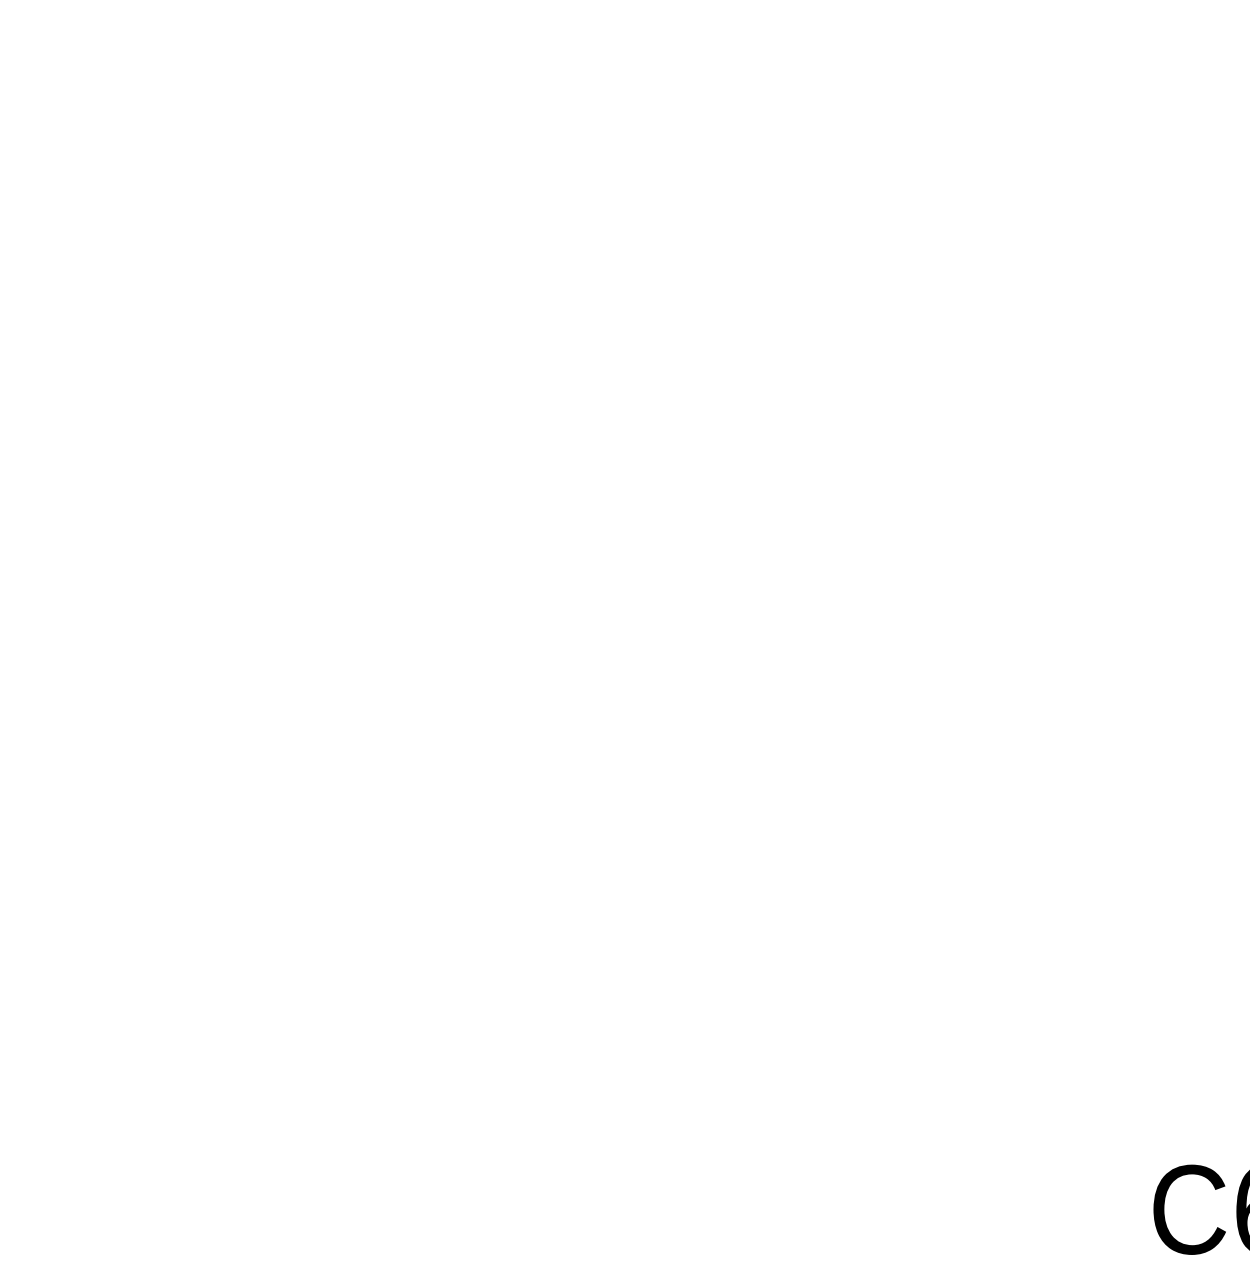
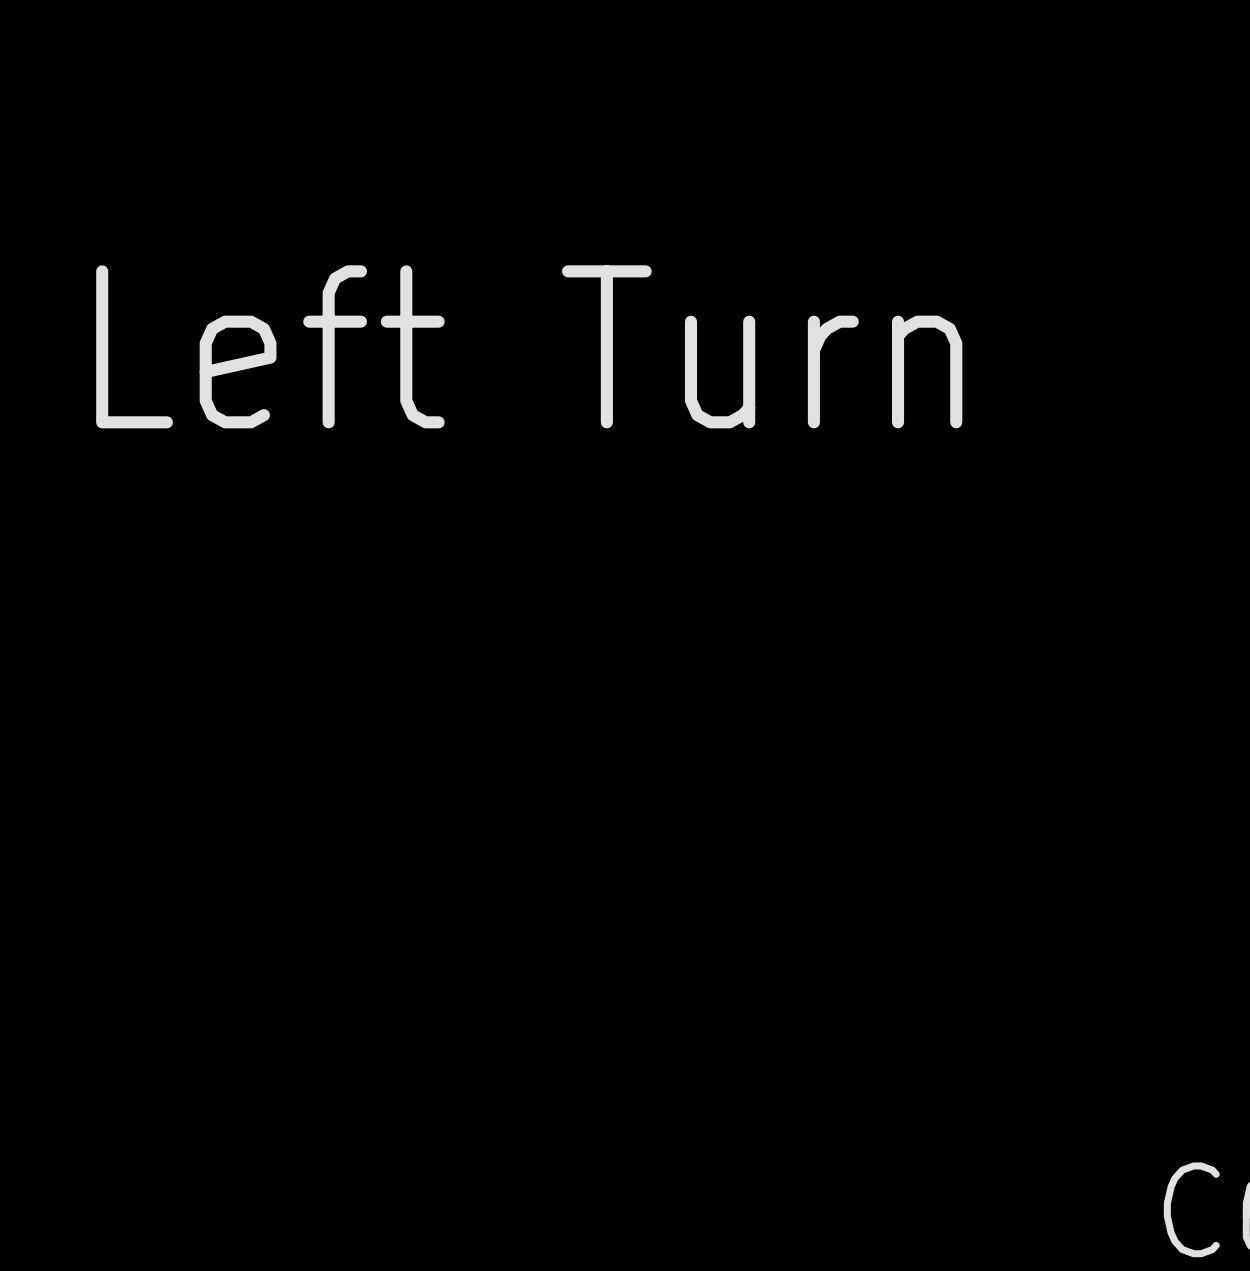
text: none -> Left Turn (529, 346)

